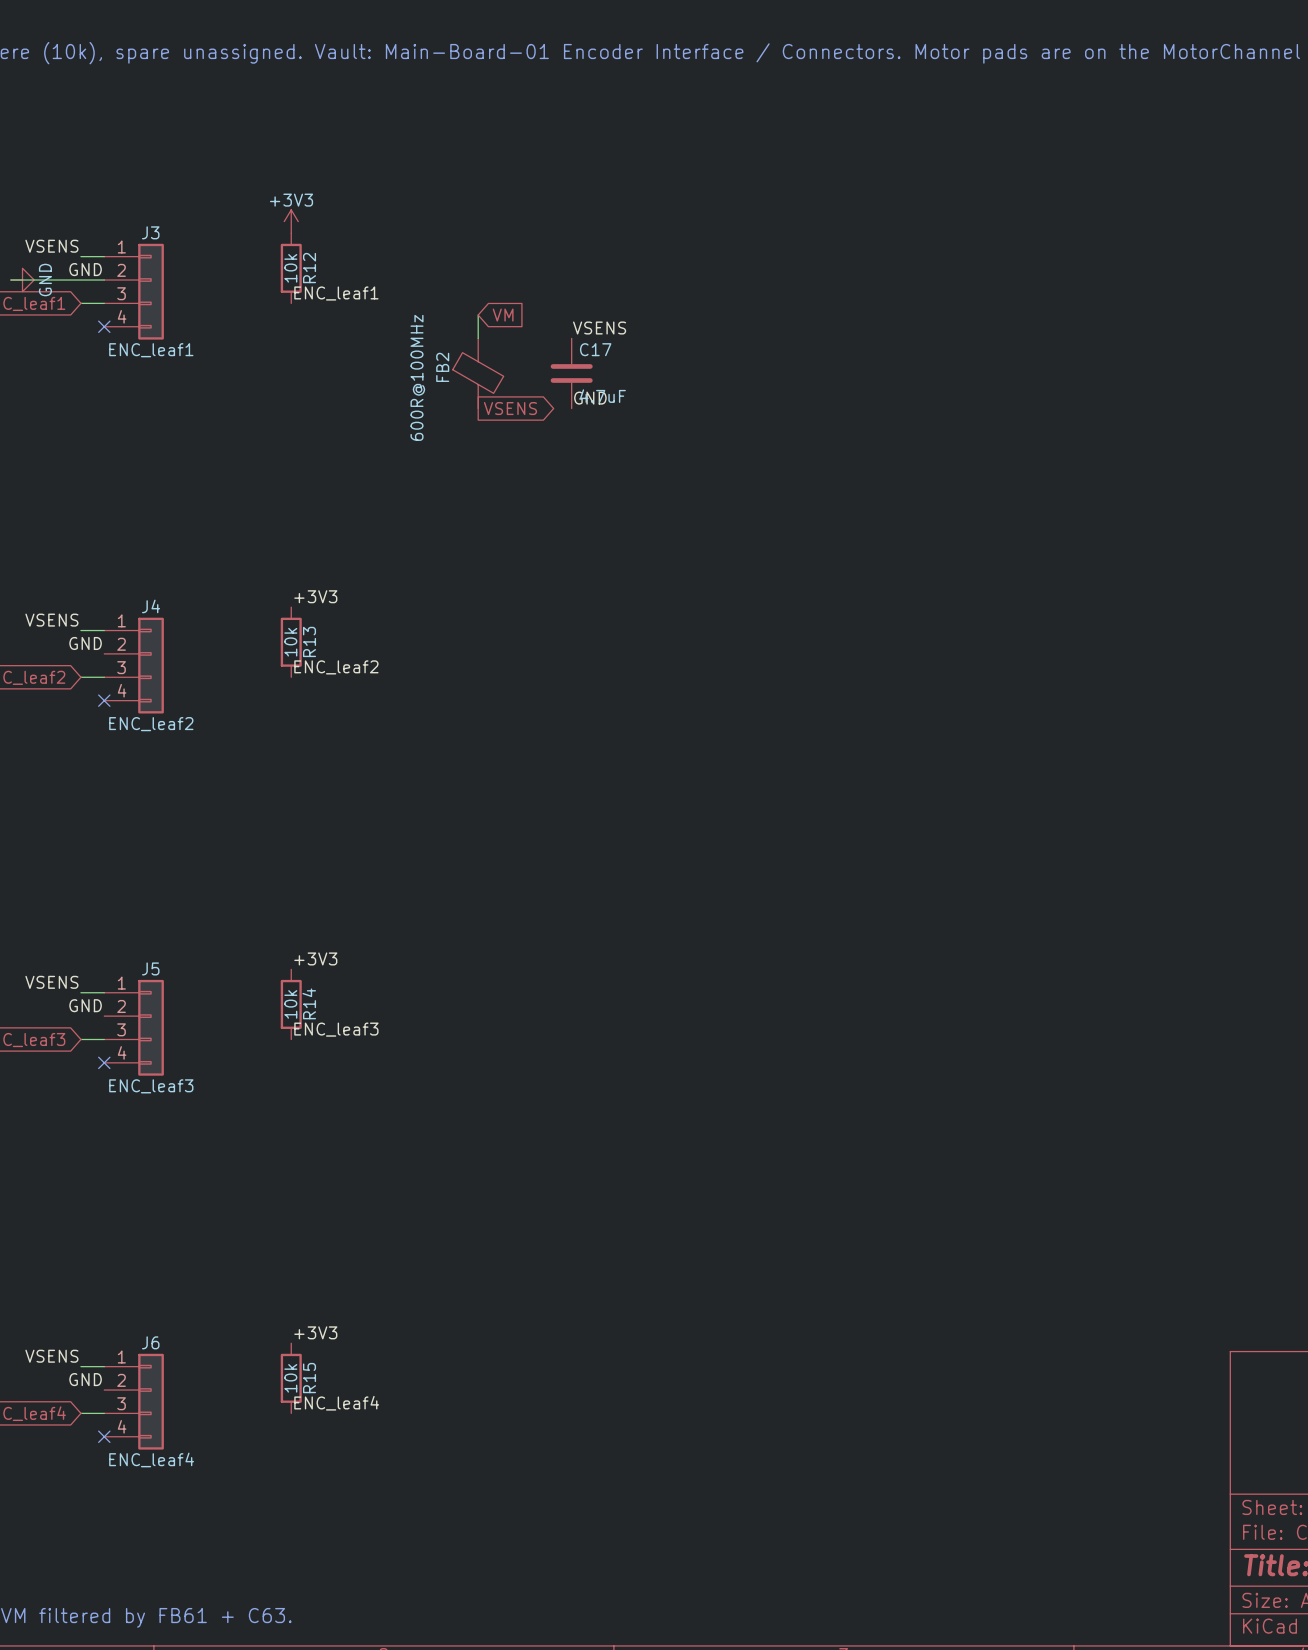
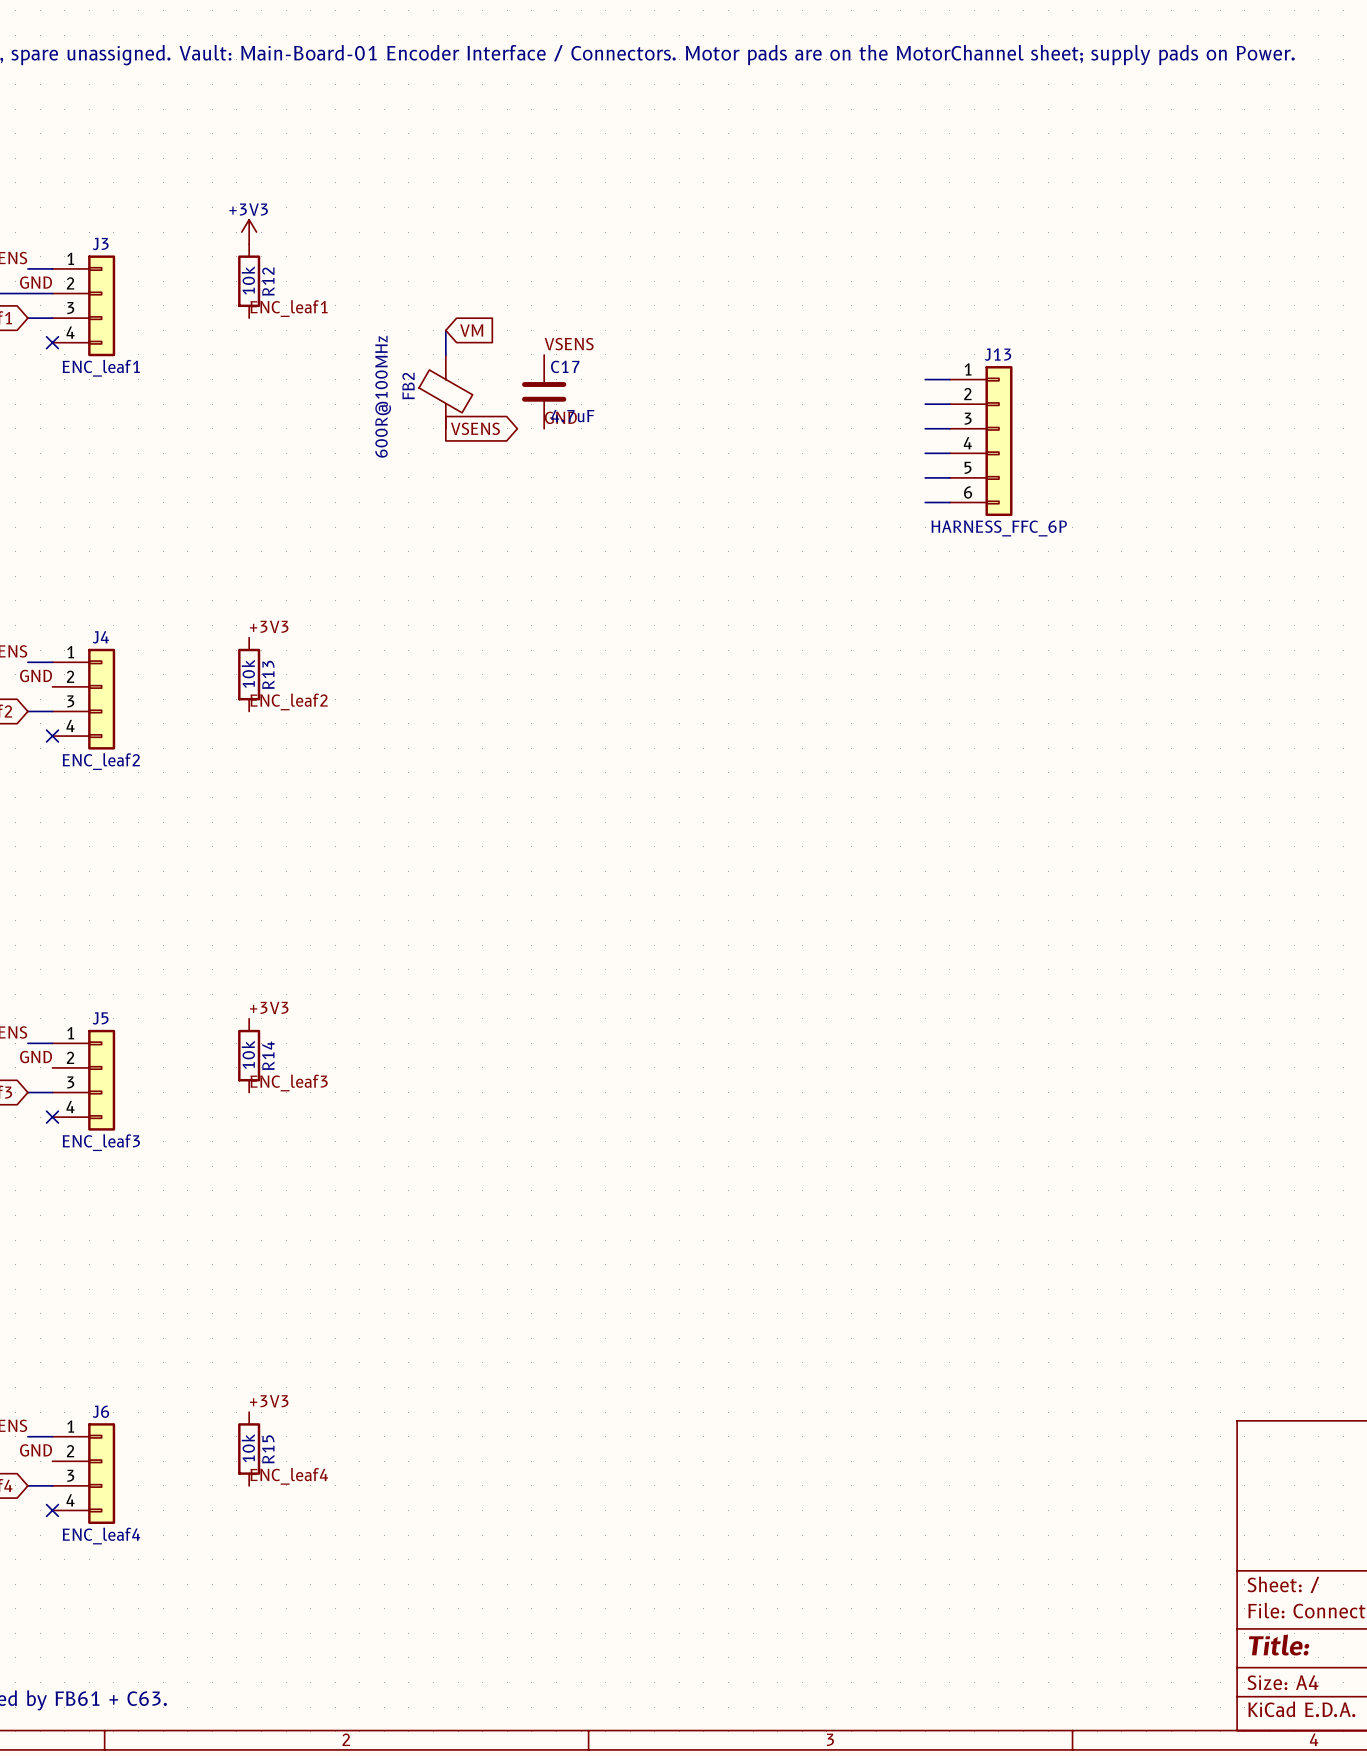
wire: none -> (925, 379) (949, 379)
wire: none -> (925, 404) (949, 404)
wire: none -> (925, 428) (949, 428)
J13: none -> HARNESS_FFC_6P (981, 441)
wire: none -> (925, 453) (949, 453)
wire: none -> (925, 477) (949, 477)
wire: none -> (925, 502) (949, 502)

